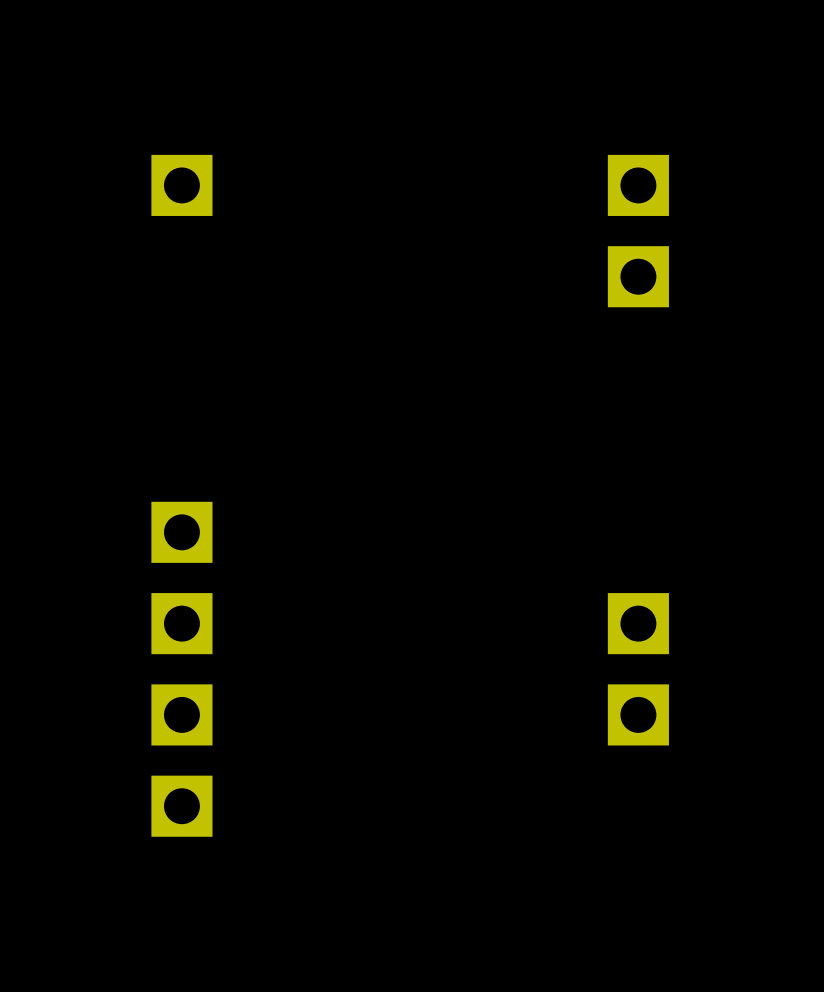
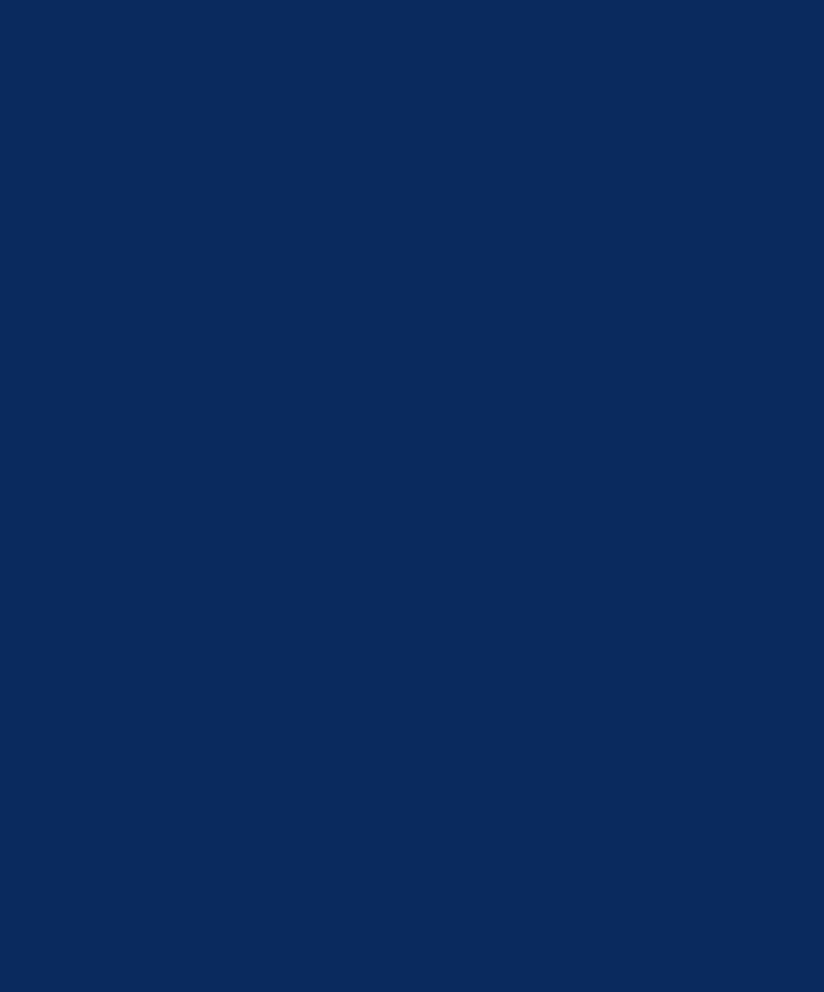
part: (181, 185) -> none
part: (638, 185) -> none
part: (638, 276) -> none
part: (181, 532) -> none
part: (181, 623) -> none
part: (638, 623) -> none
part: (181, 714) -> none
part: (638, 714) -> none
part: (181, 806) -> none

